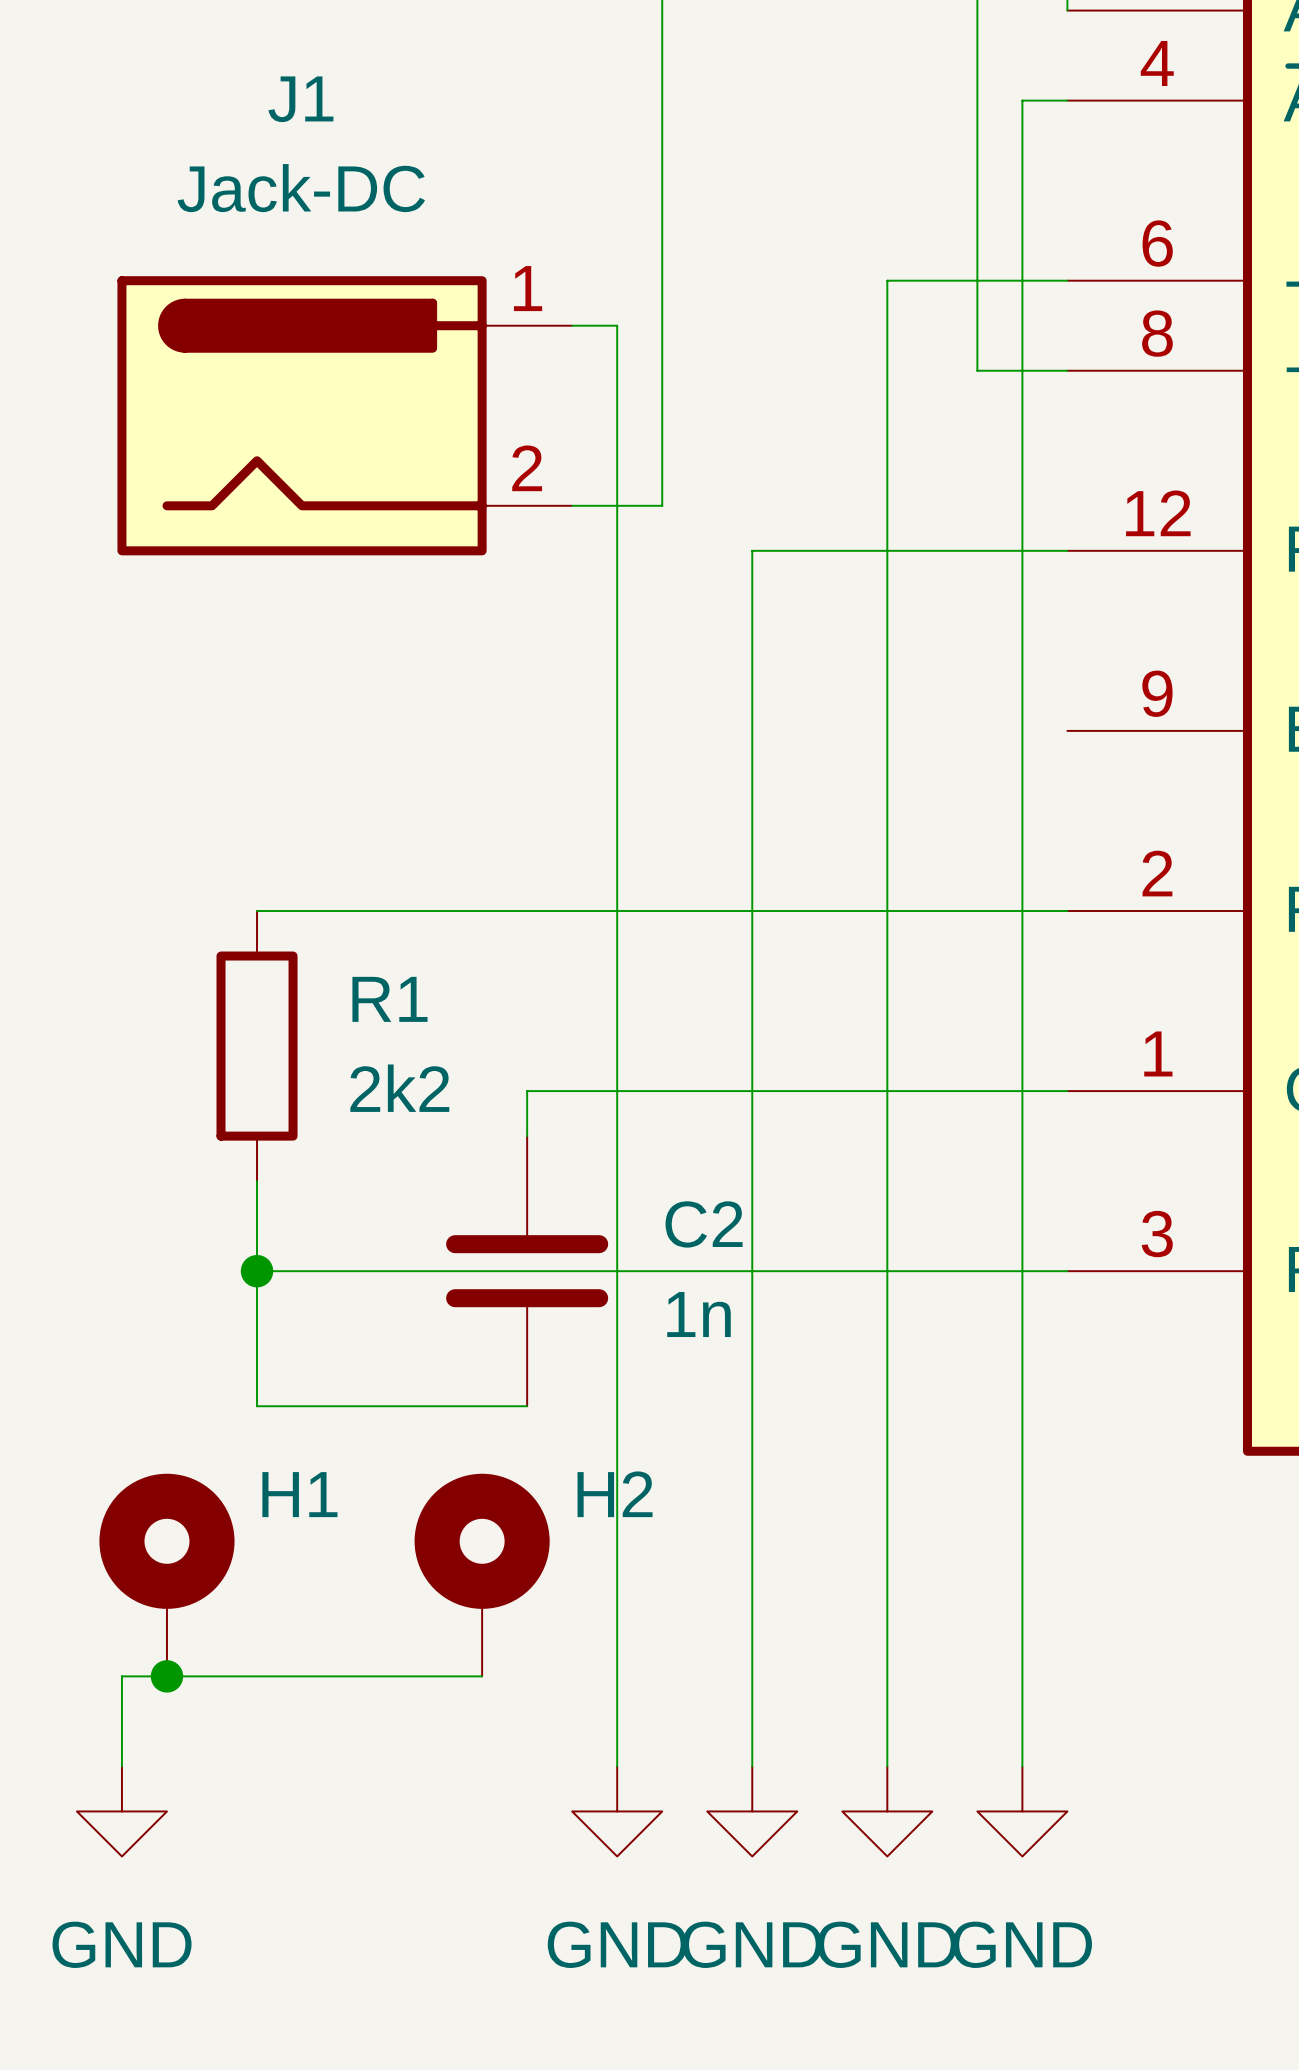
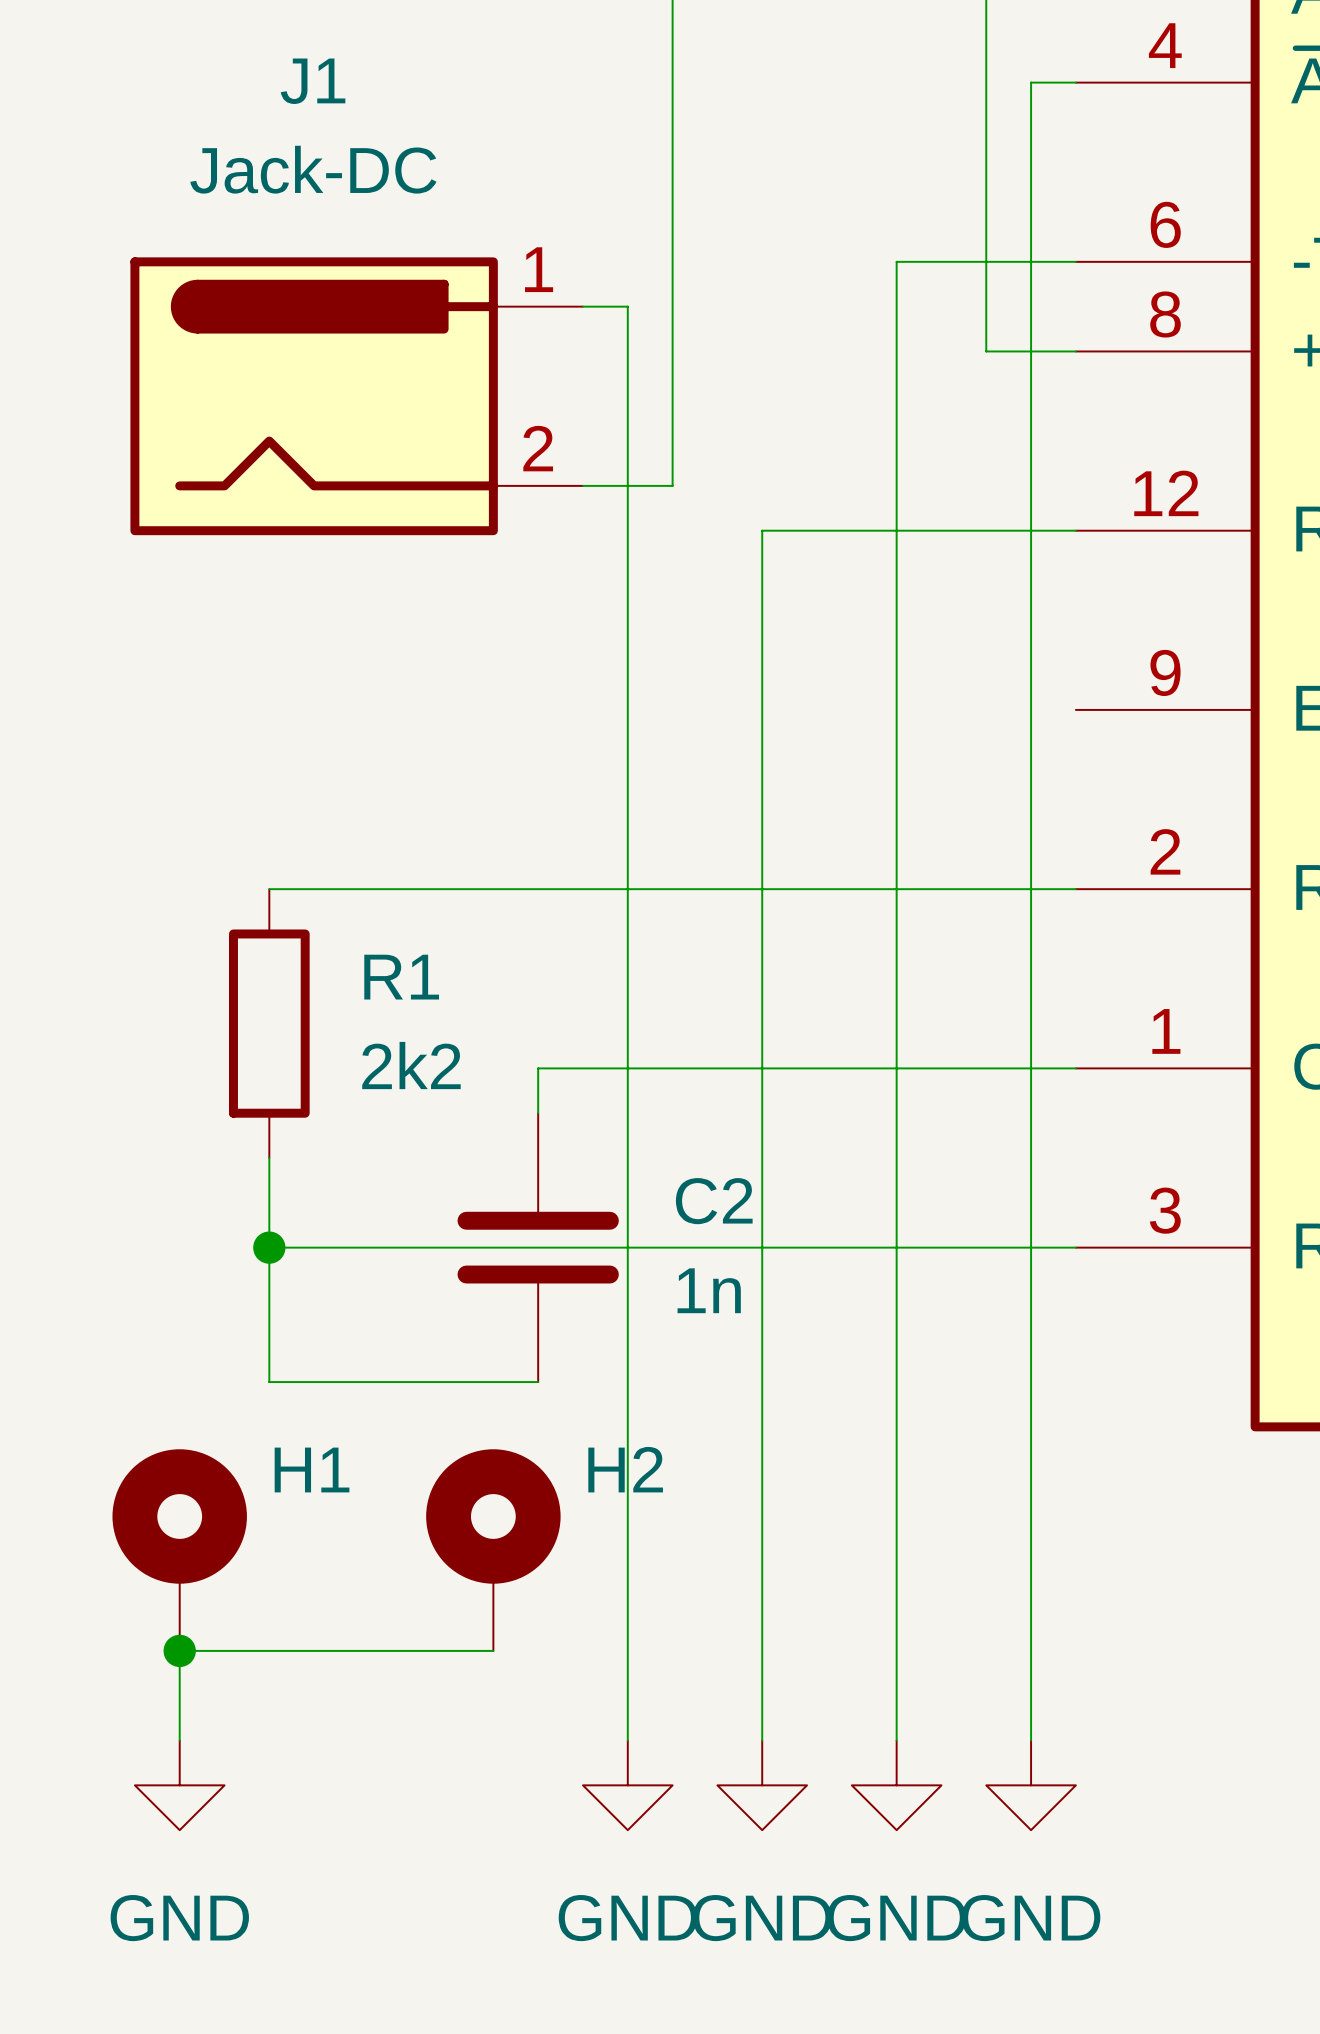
wire: (166, 1676) (121, 1676) (121, 1766) -> (179, 1650) (179, 1740)
power symbol position: GND (121, 1811) -> GND (179, 1785)

